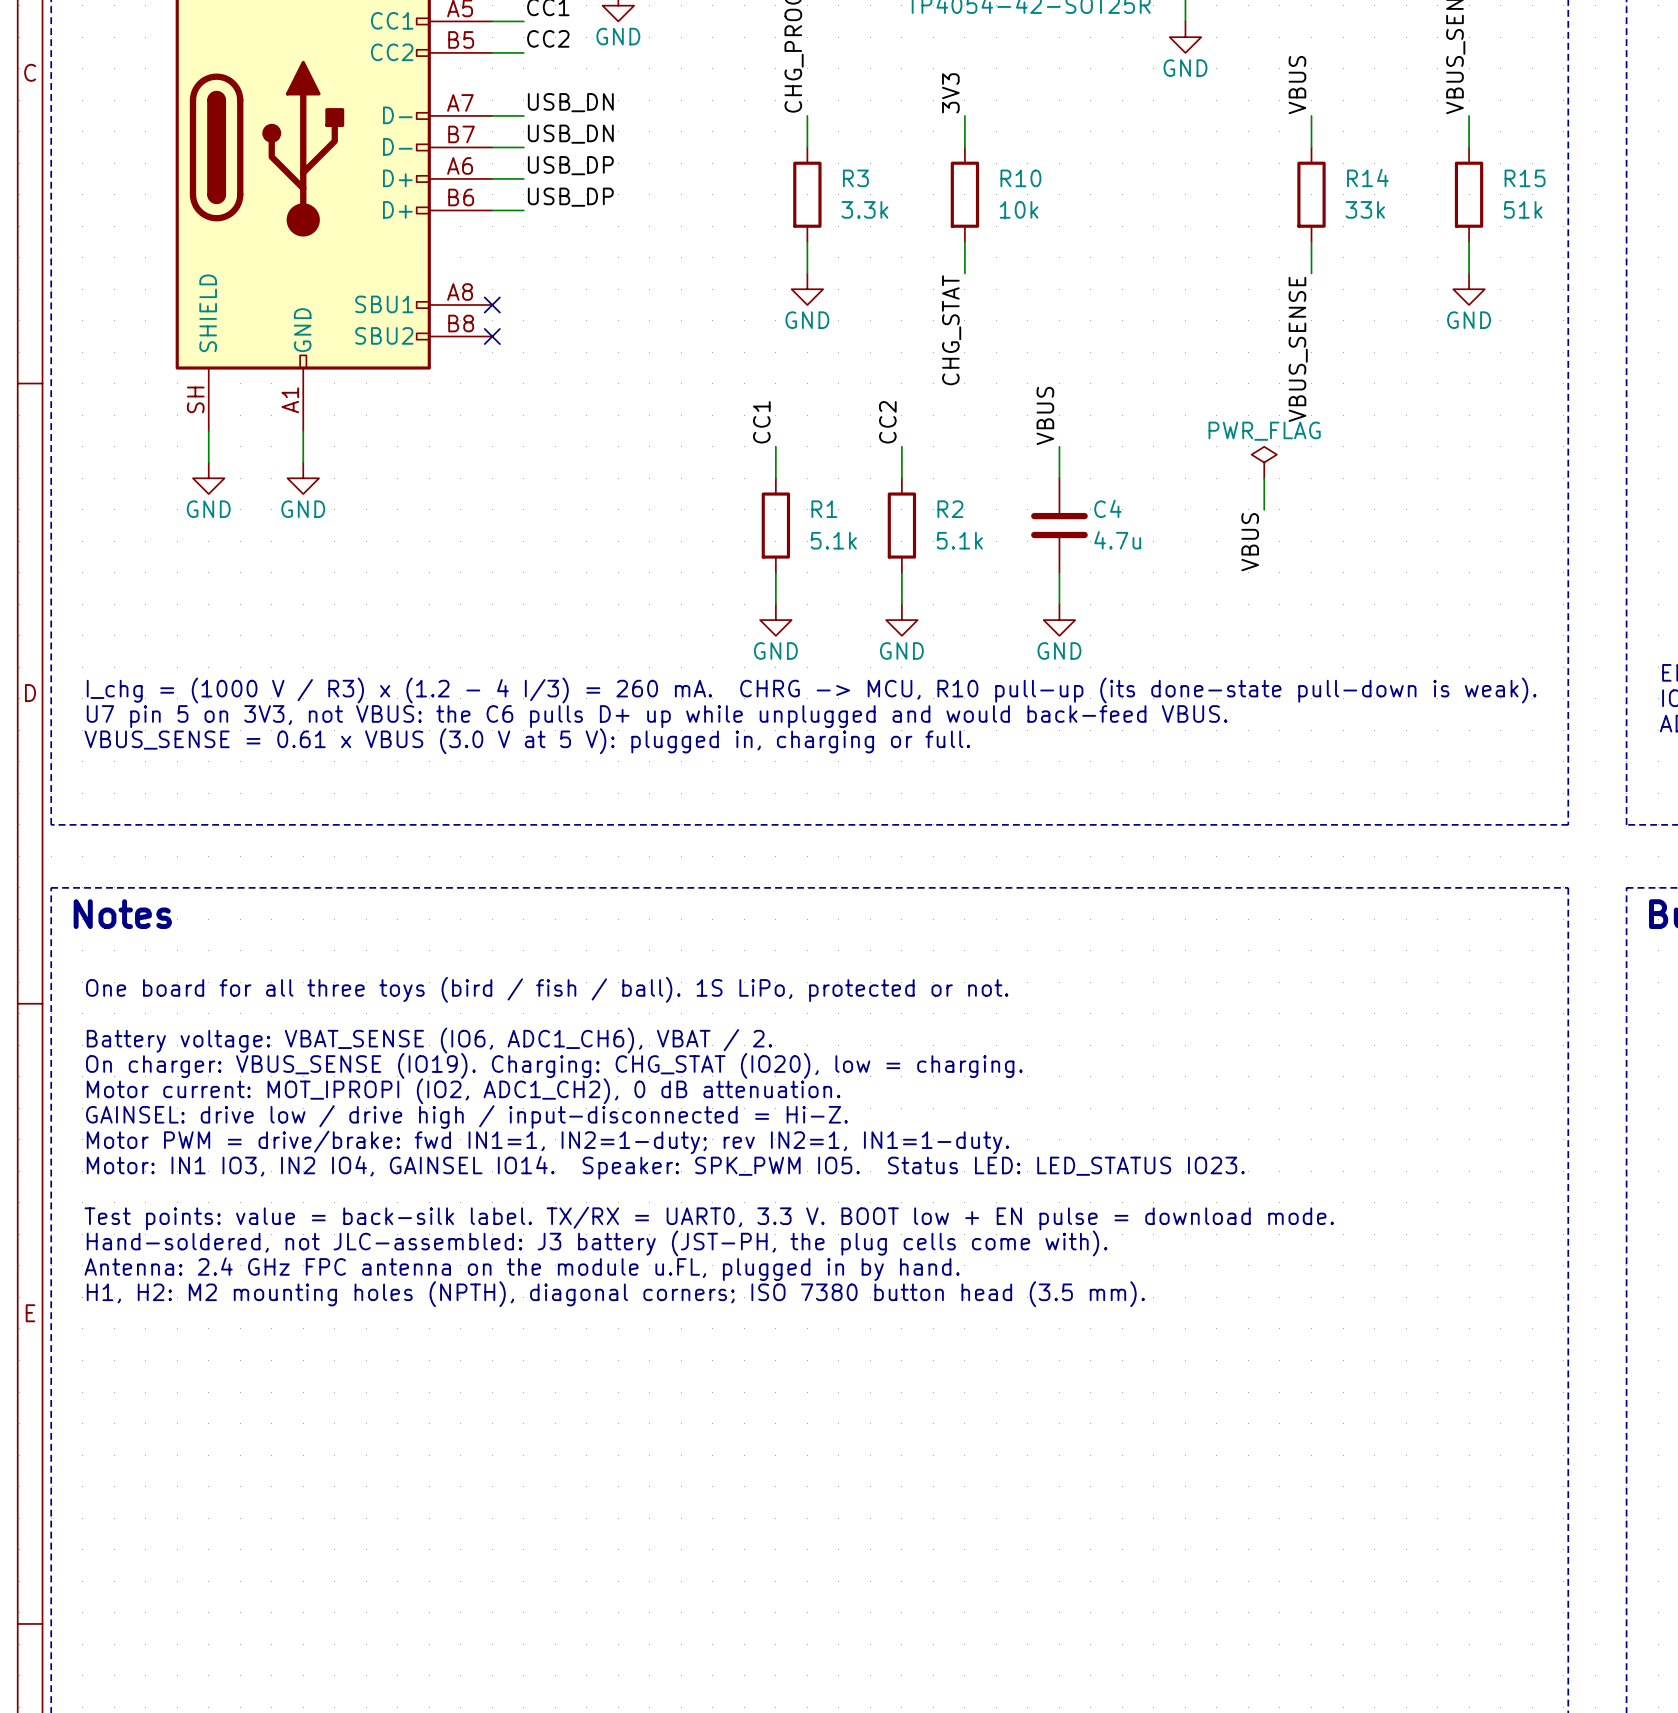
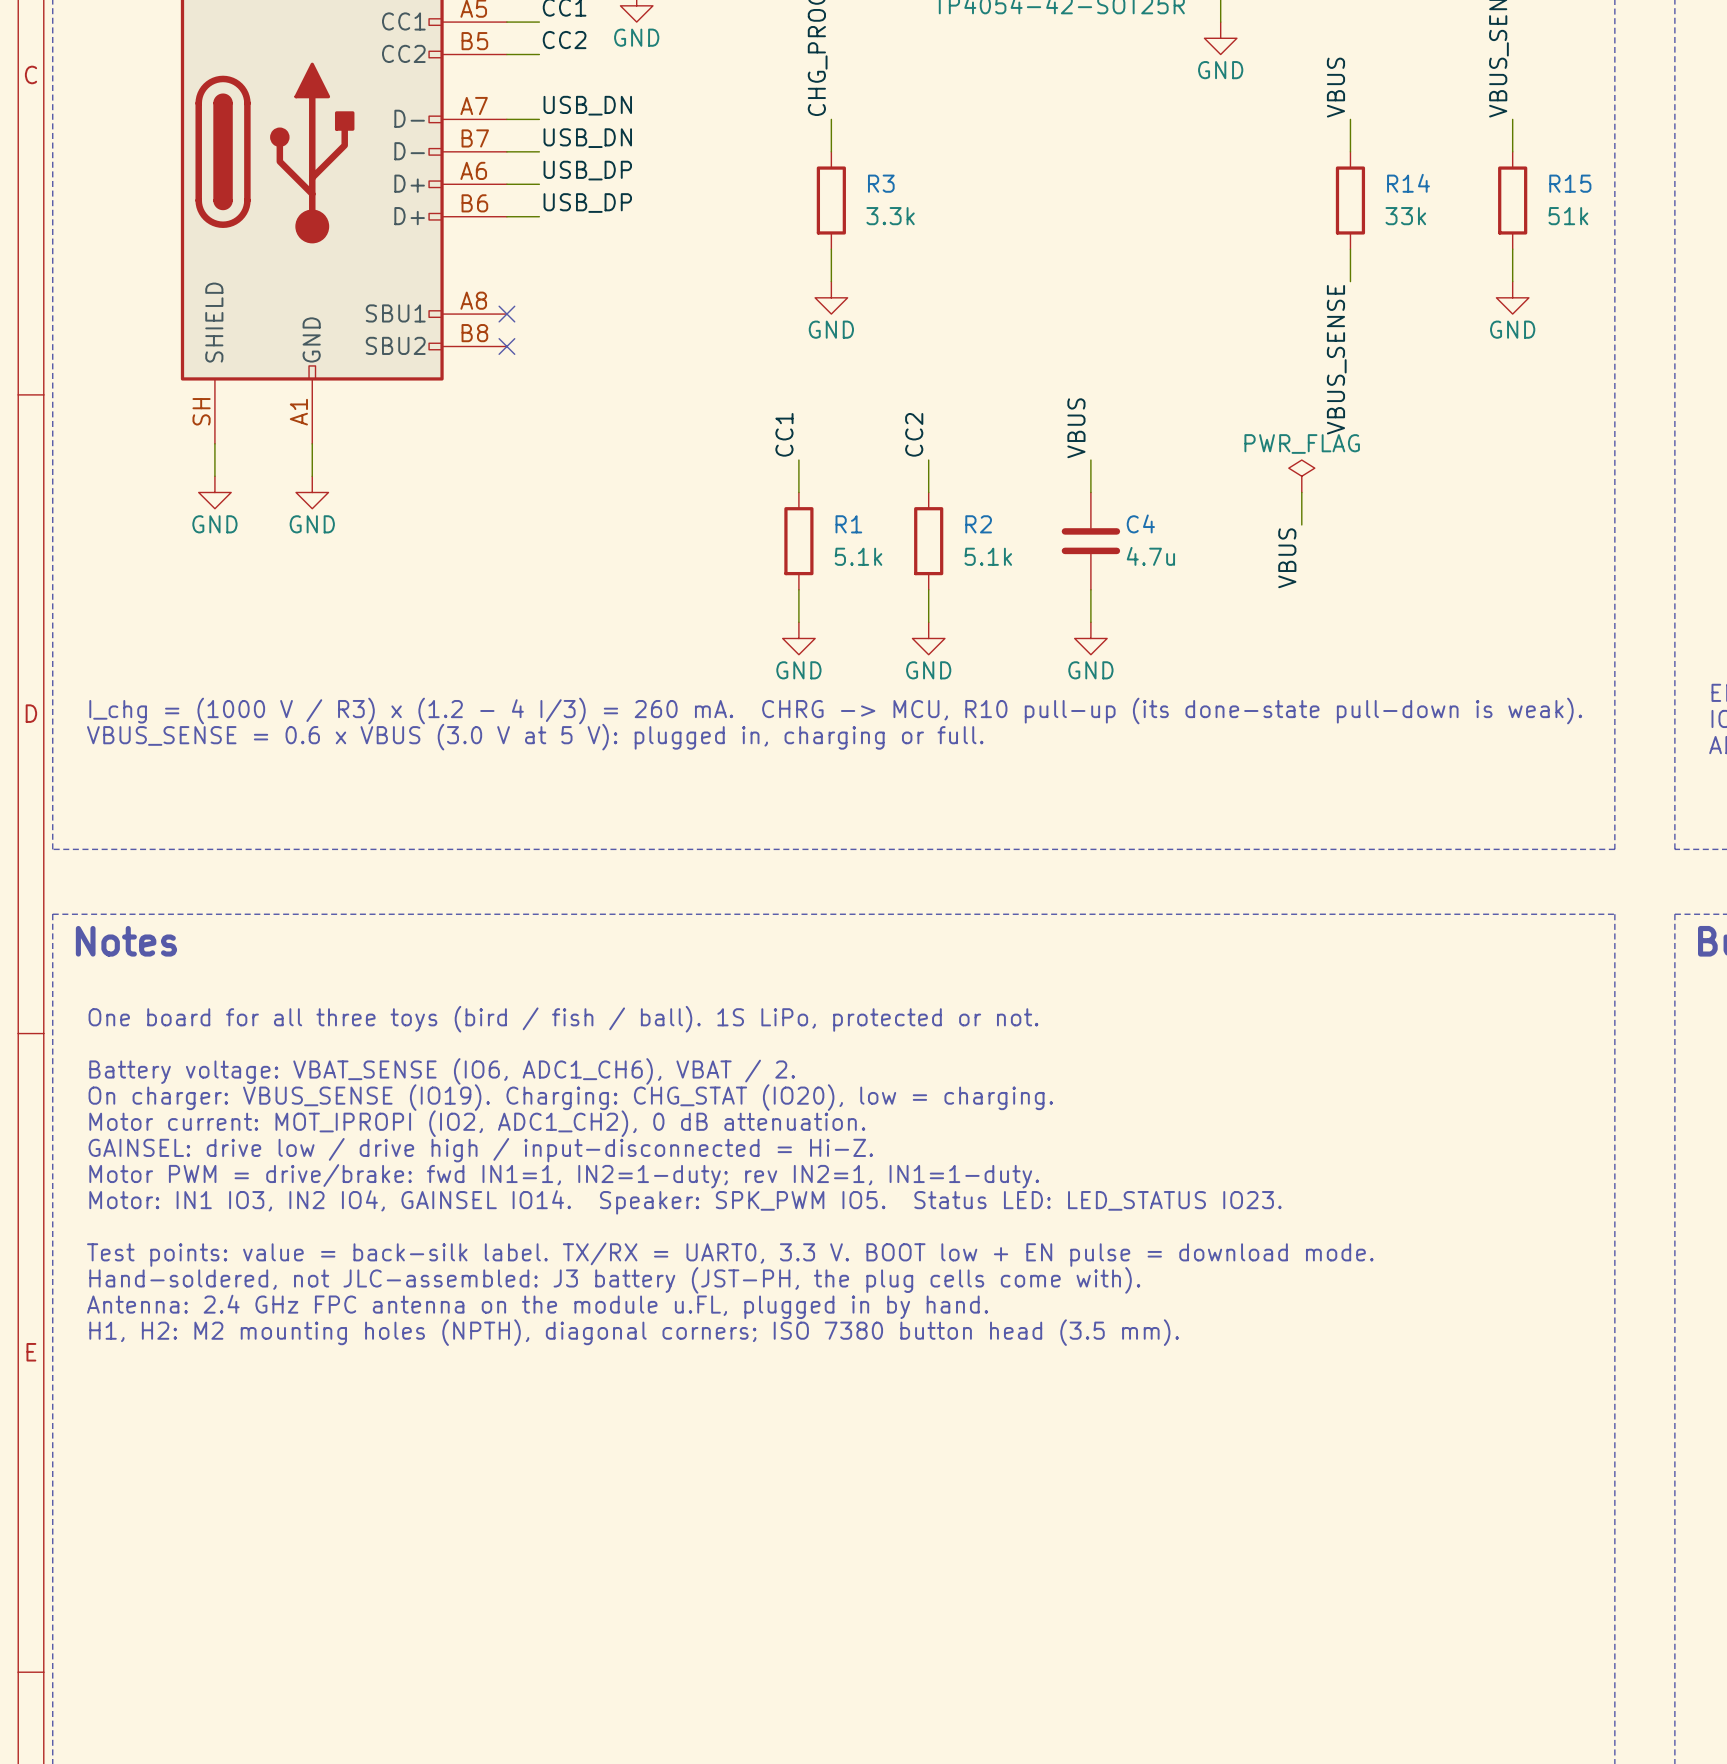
label: 3V3 (950, 93) -> none
wire: (964, 115) (964, 147) -> none
R10: 10k (964, 194) -> none
wire: (964, 241) (964, 273) -> none
label: CHG_STAT (951, 330) -> none
text: U7 pin 5 on 3V3, not VBUS: the C6 pulls D+ up while unplugged and would back-feed VBUS. (657, 716) -> VBUS_SENSE = 0.6 x VBUS (3.0 V at 5 V): plugged in, charging or full. (535, 737)
text: VBUS_SENSE = 0.61 x VBUS (3.0 V at 5 V): plugged in, charging or full. (527, 741) -> none

